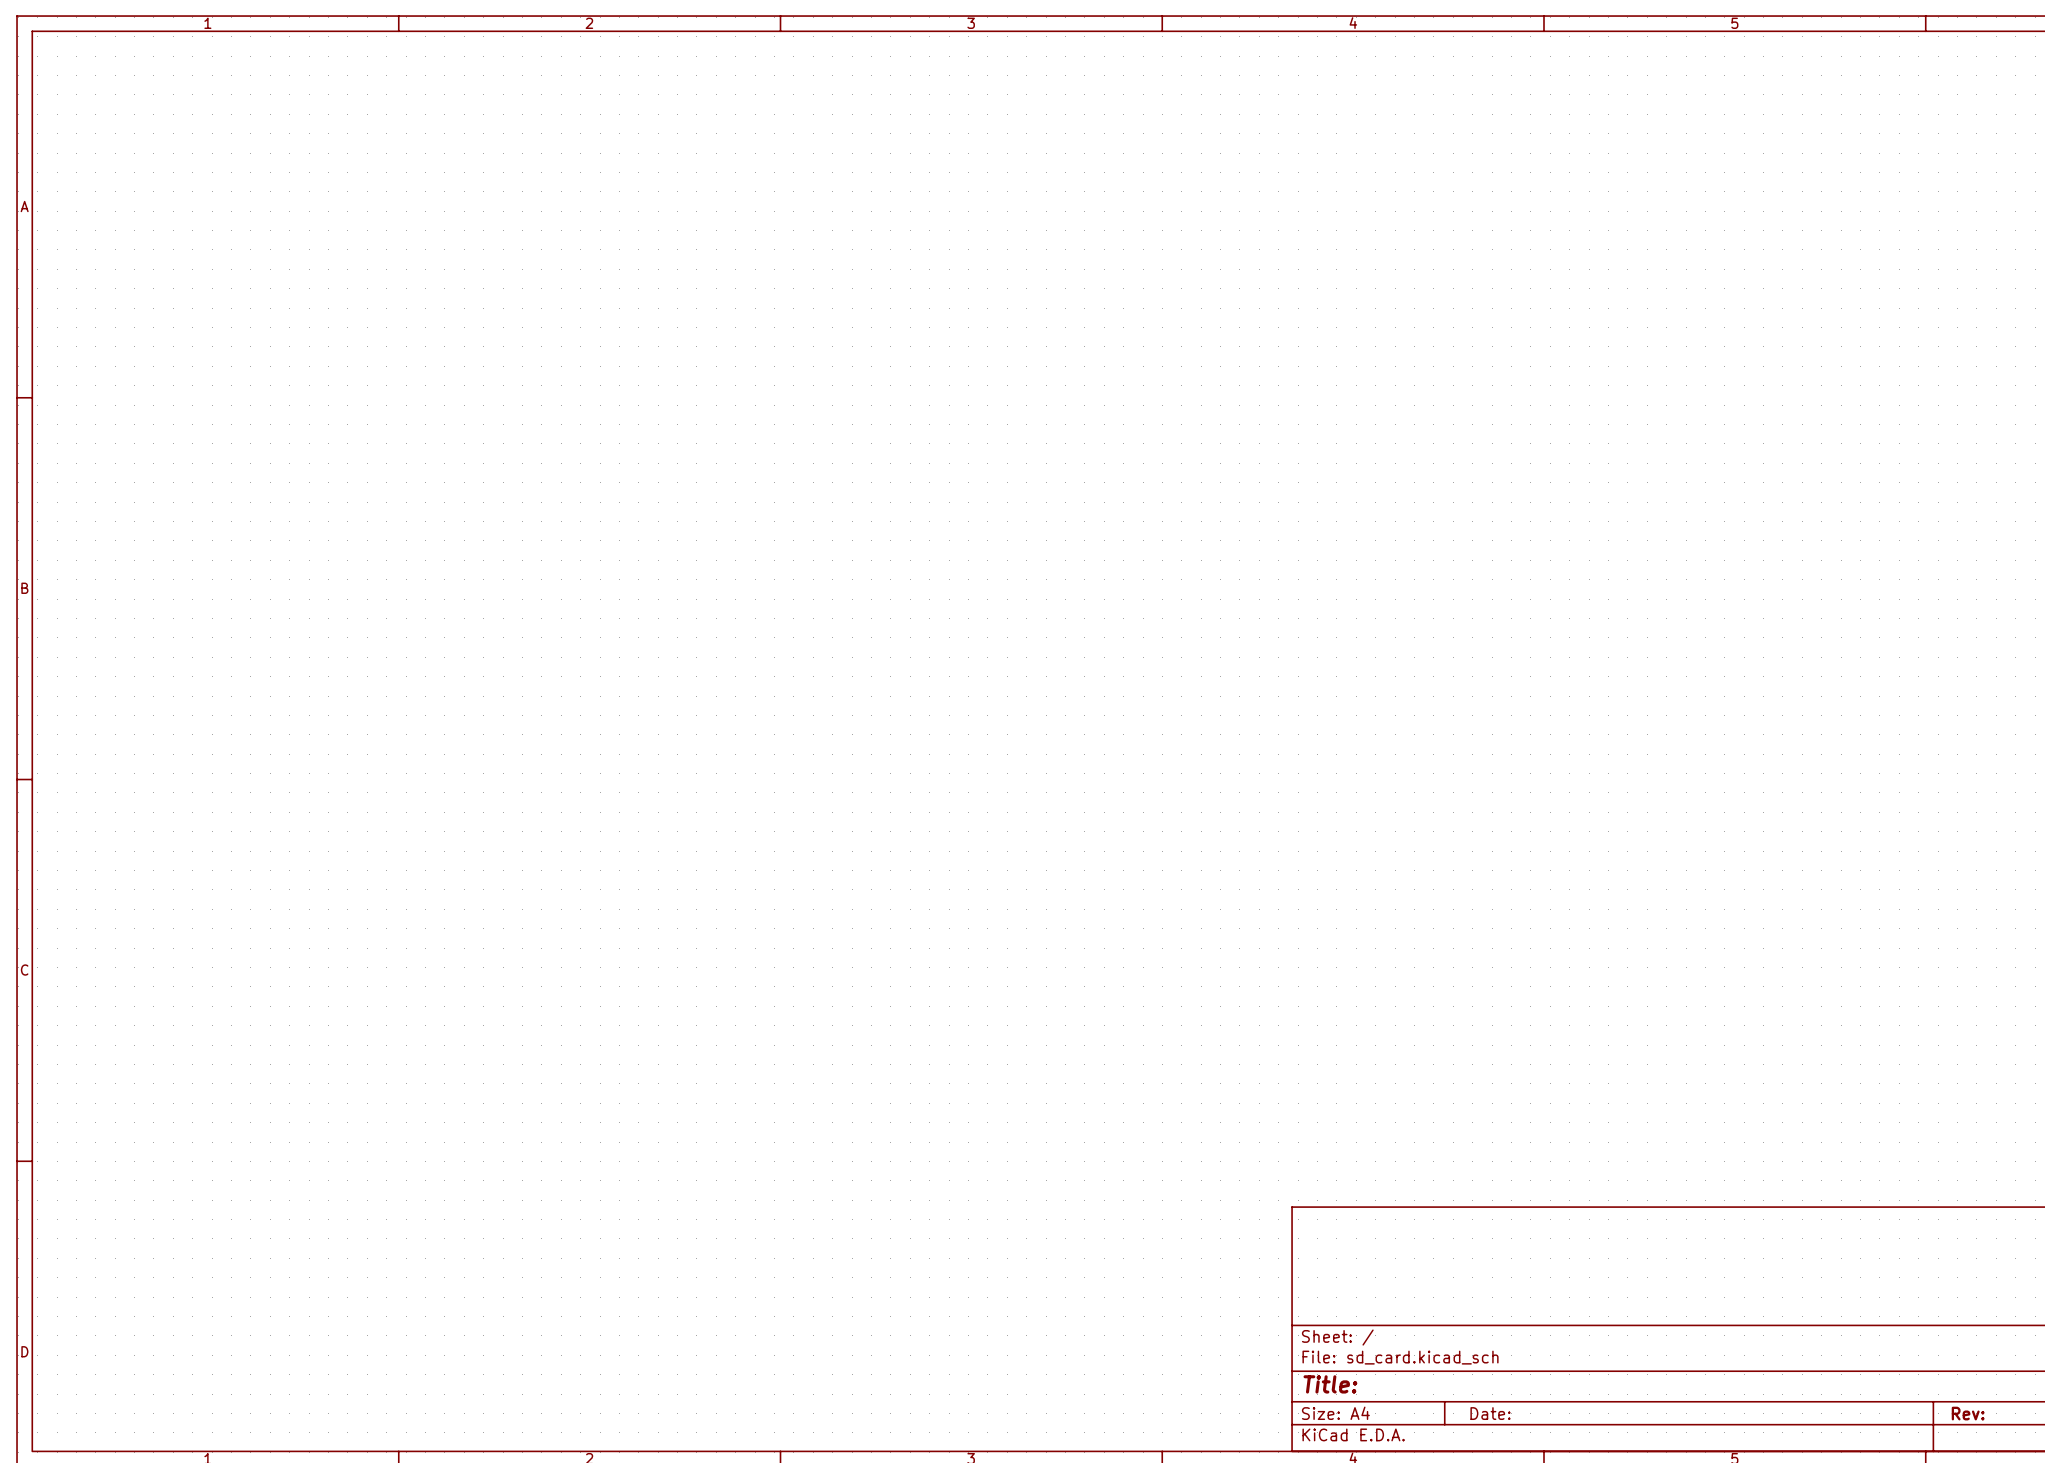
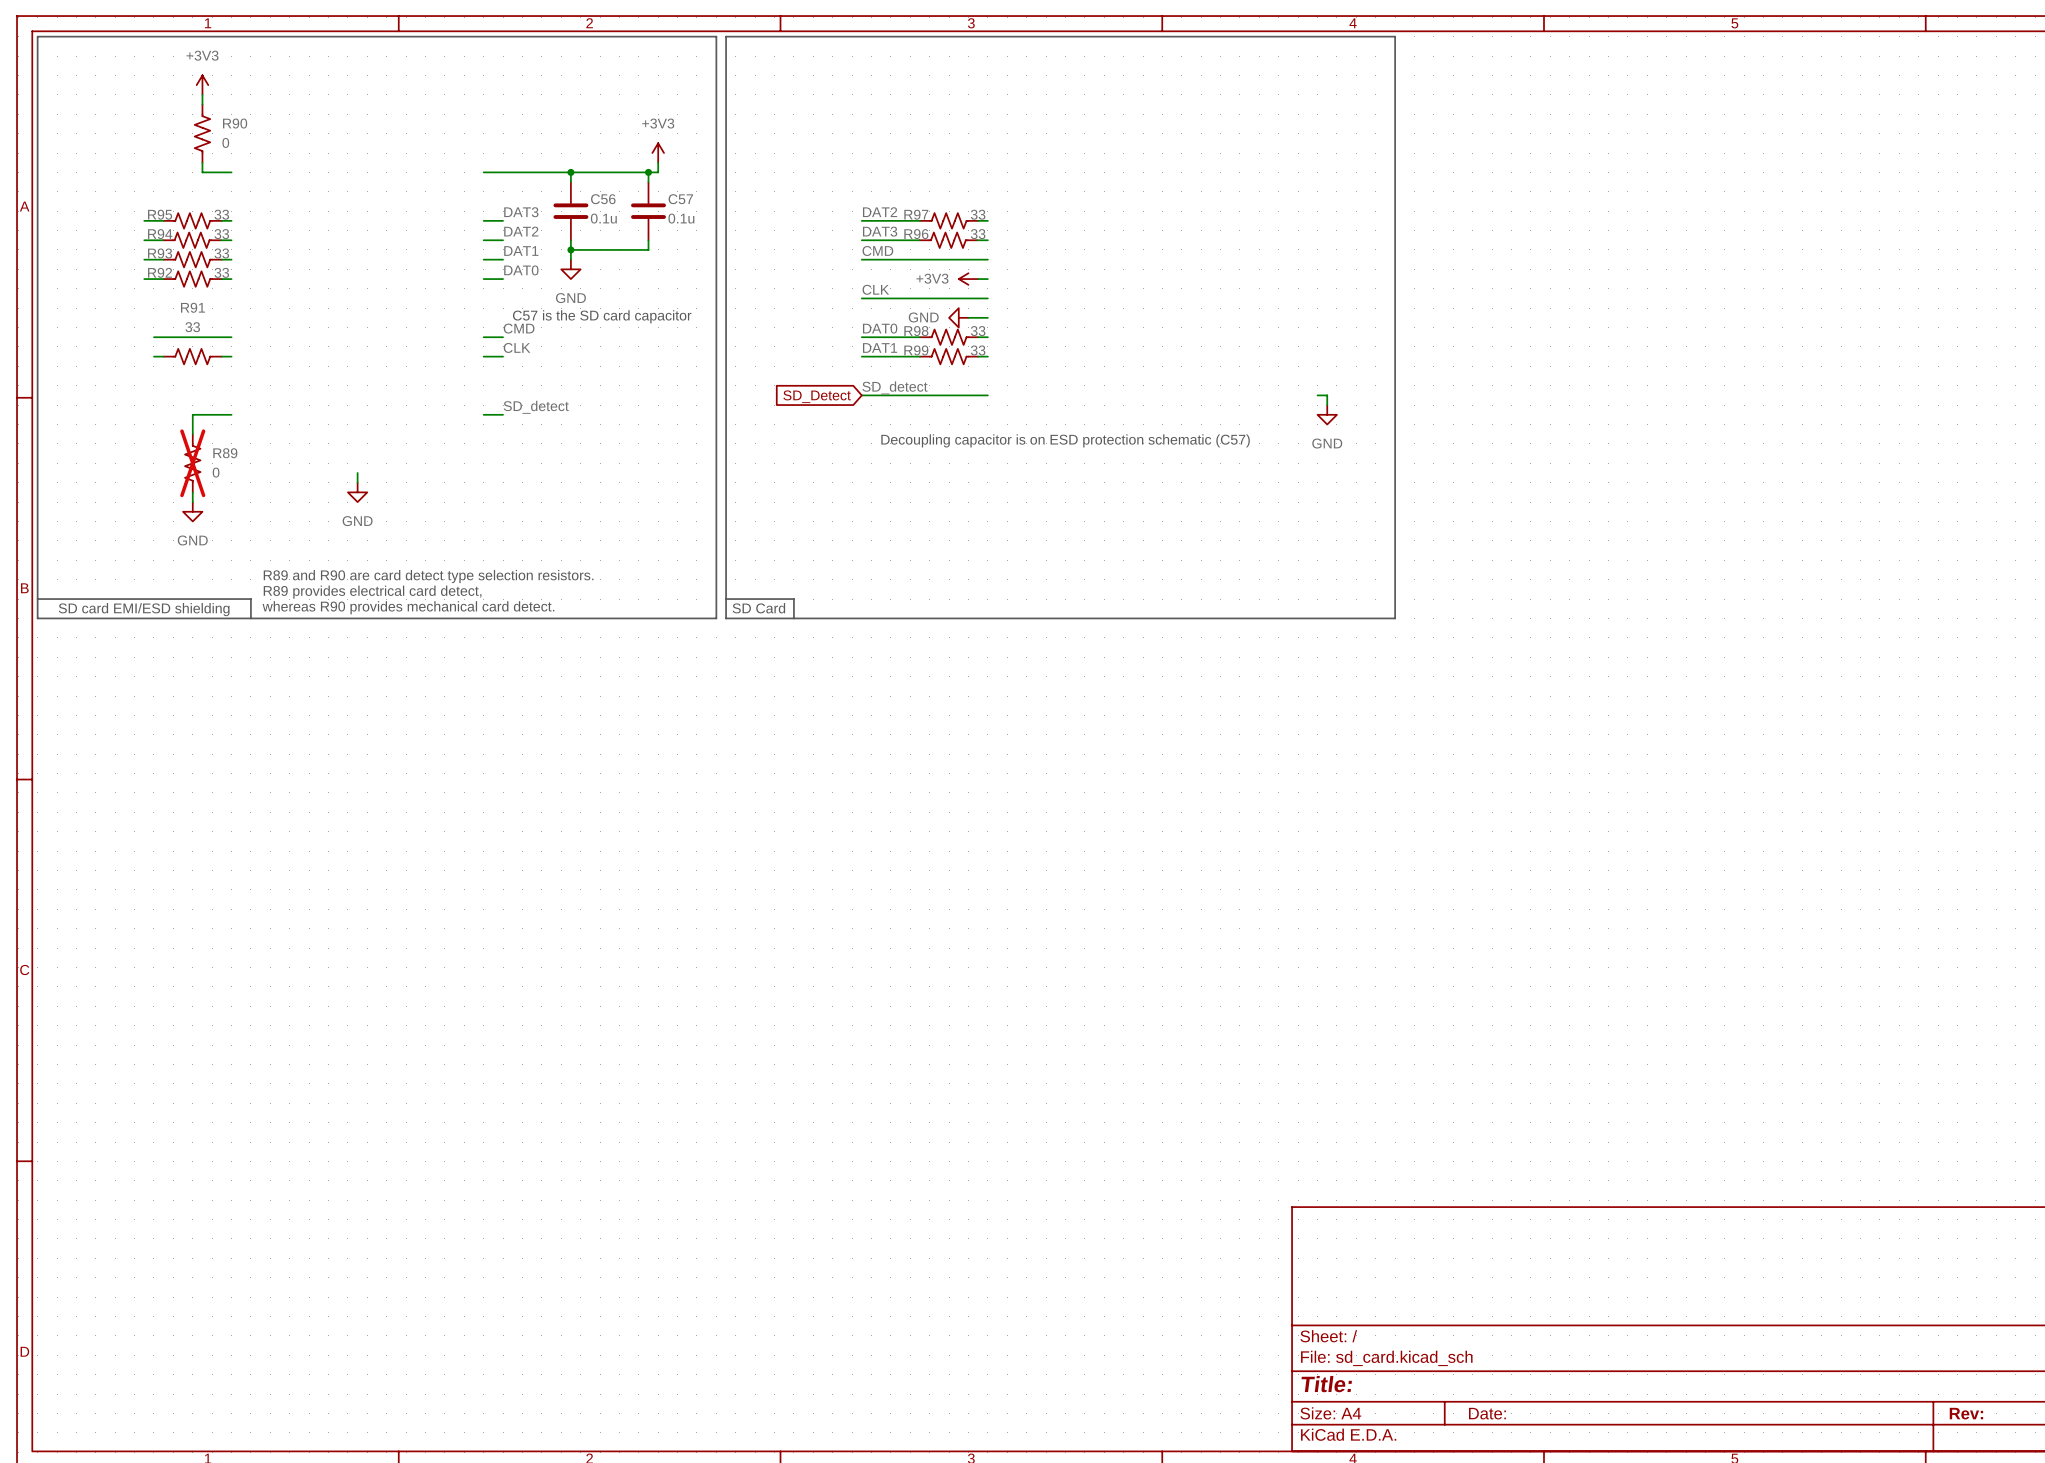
line: none -> (37, 36) (716, 36) (716, 618) (37, 618) (37, 36)
line: none -> (726, 36) (1395, 36) (1395, 618) (726, 618) (726, 36)
power symbol: none -> +3V3 (202, 85)
wire: none -> (202, 94) (202, 104)
R90: none -> 0 (202, 133)
power symbol: none -> +3V3 (658, 153)
wire: none -> (202, 162) (202, 172) (231, 172)
wire: none -> (658, 162) (658, 172) (483, 172)
wire: none -> (570, 172) (570, 182)
junction: none -> (570, 172)
wire: none -> (648, 172) (648, 182)
junction: none -> (648, 172)
C56: none -> 0.1u (570, 211)
C57: none -> 0.1u (648, 211)
label: none -> DAT3 (521, 212)
label: none -> DAT2 (880, 212)
wire: none -> (144, 220) (163, 220)
R95: none -> 33 (192, 220)
wire: none -> (221, 220) (231, 220)
wire: none -> (483, 220) (503, 220)
wire: none -> (861, 220) (919, 220)
R97: none -> 33 (949, 220)
wire: none -> (978, 220) (987, 220)
label: none -> DAT2 (521, 231)
label: none -> DAT3 (880, 231)
wire: none -> (144, 240) (162, 240)
R94: none -> 33 (192, 240)
wire: none -> (221, 240) (231, 240)
wire: none -> (483, 240) (503, 240)
wire: none -> (570, 240) (570, 259)
wire: none -> (648, 240) (648, 249) (570, 249)
wire: none -> (861, 240) (919, 240)
R96: none -> 33 (948, 240)
wire: none -> (977, 240) (987, 240)
junction: none -> (570, 249)
label: none -> DAT1 (521, 251)
label: none -> CMD (877, 251)
wire: none -> (144, 259) (163, 259)
R93: none -> 33 (192, 259)
wire: none -> (221, 259) (231, 259)
wire: none -> (483, 259) (503, 259)
wire: none -> (861, 259) (987, 259)
power symbol: none -> GND (570, 269)
label: none -> DAT0 (521, 270)
wire: none -> (144, 279) (163, 279)
R92: none -> 33 (192, 279)
wire: none -> (221, 279) (231, 279)
wire: none -> (483, 279) (503, 279)
power symbol: none -> +3V3 (968, 279)
wire: none -> (978, 279) (987, 279)
label: none -> CLK (875, 289)
wire: none -> (861, 298) (987, 298)
text: none -> C57 is the SD card capacitor (602, 316)
power symbol: none -> GND (958, 317)
wire: none -> (968, 317) (987, 317)
label: none -> CMD (519, 328)
label: none -> DAT0 (880, 328)
wire: none -> (153, 337) (231, 337)
wire: none -> (483, 337) (503, 337)
wire: none -> (861, 337) (919, 337)
R98: none -> 33 (949, 337)
wire: none -> (978, 337) (987, 337)
label: none -> CLK (517, 347)
label: none -> DAT1 (880, 347)
wire: none -> (153, 356) (163, 356)
R91: none -> 33 (192, 356)
wire: none -> (221, 356) (231, 356)
wire: none -> (483, 356) (503, 356)
wire: none -> (861, 356) (919, 356)
R99: none -> 33 (949, 356)
wire: none -> (978, 356) (987, 356)
label: none -> SD_detect (894, 387)
global label: none -> SD_Detect (817, 396)
wire: none -> (861, 395) (987, 395)
wire: none -> (1317, 395) (1327, 395) (1327, 405)
label: none -> SD_detect (536, 407)
wire: none -> (231, 414) (192, 414) (192, 434)
wire: none -> (483, 414) (503, 414)
power symbol: none -> GND (1327, 414)
text: none -> Decoupling capacitor is on ESD protection schematic (C57) (1065, 440)
R89: none -> 0 (192, 463)
wire: none -> (357, 472) (357, 482)
wire: none -> (192, 492) (192, 502)
power symbol: none -> GND (357, 492)
power symbol: none -> GND (192, 511)
text: none -> R89 and R90 are card detect type selection resistors. (428, 576)
text: none -> R89 provides electrical card detect, (372, 592)
line: none -> (37, 599) (250, 599) (250, 618)
line: none -> (726, 599) (793, 599) (793, 618)
text: none -> whereas R90 provides mechanical card detect. (408, 607)
text: none -> SD Card (758, 608)
text: none -> SD card EMI/ESD shielding (144, 609)

